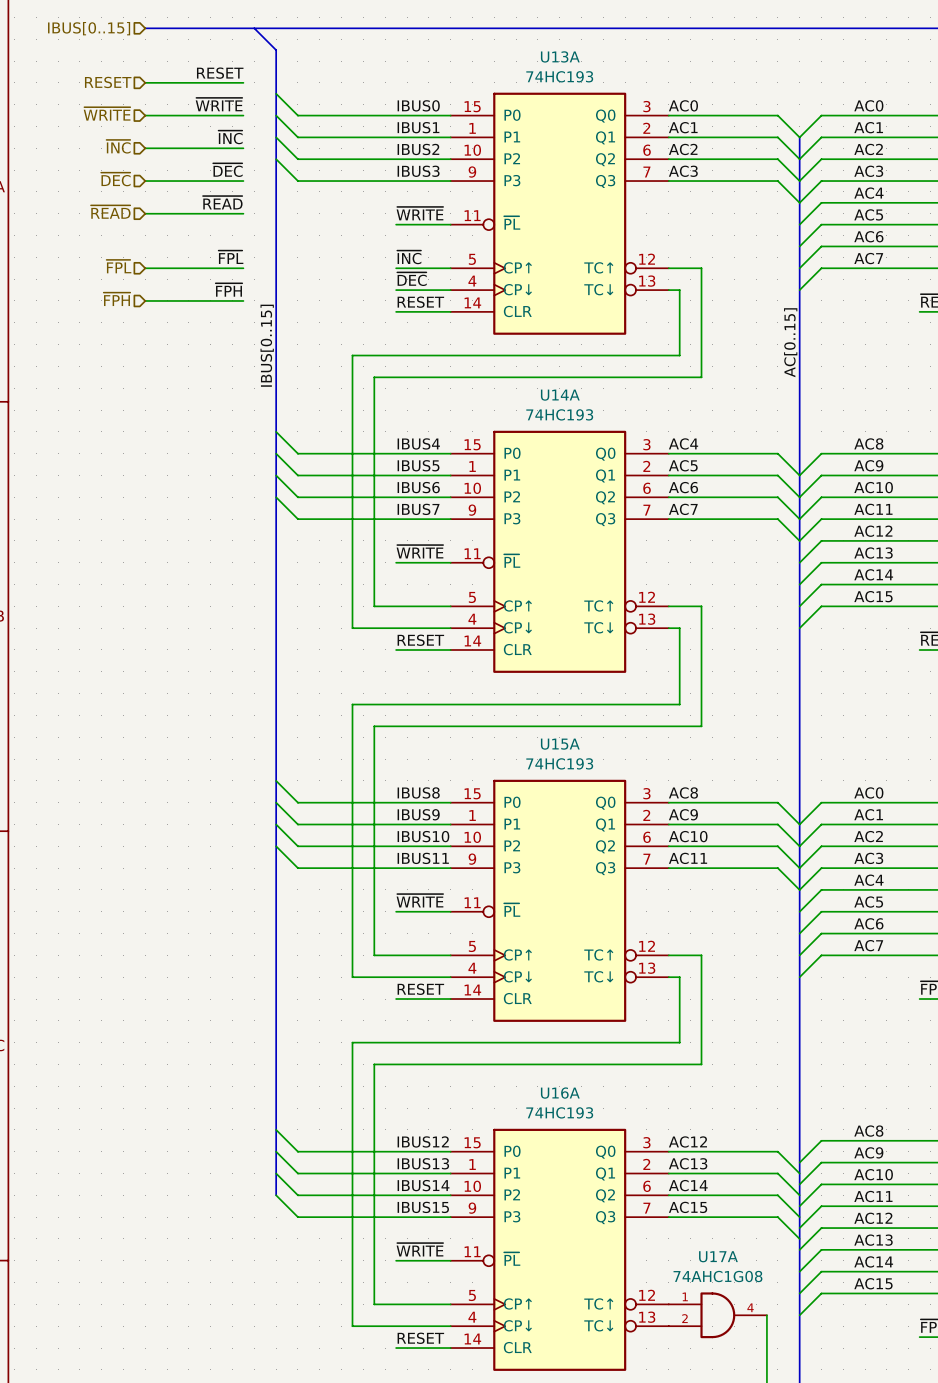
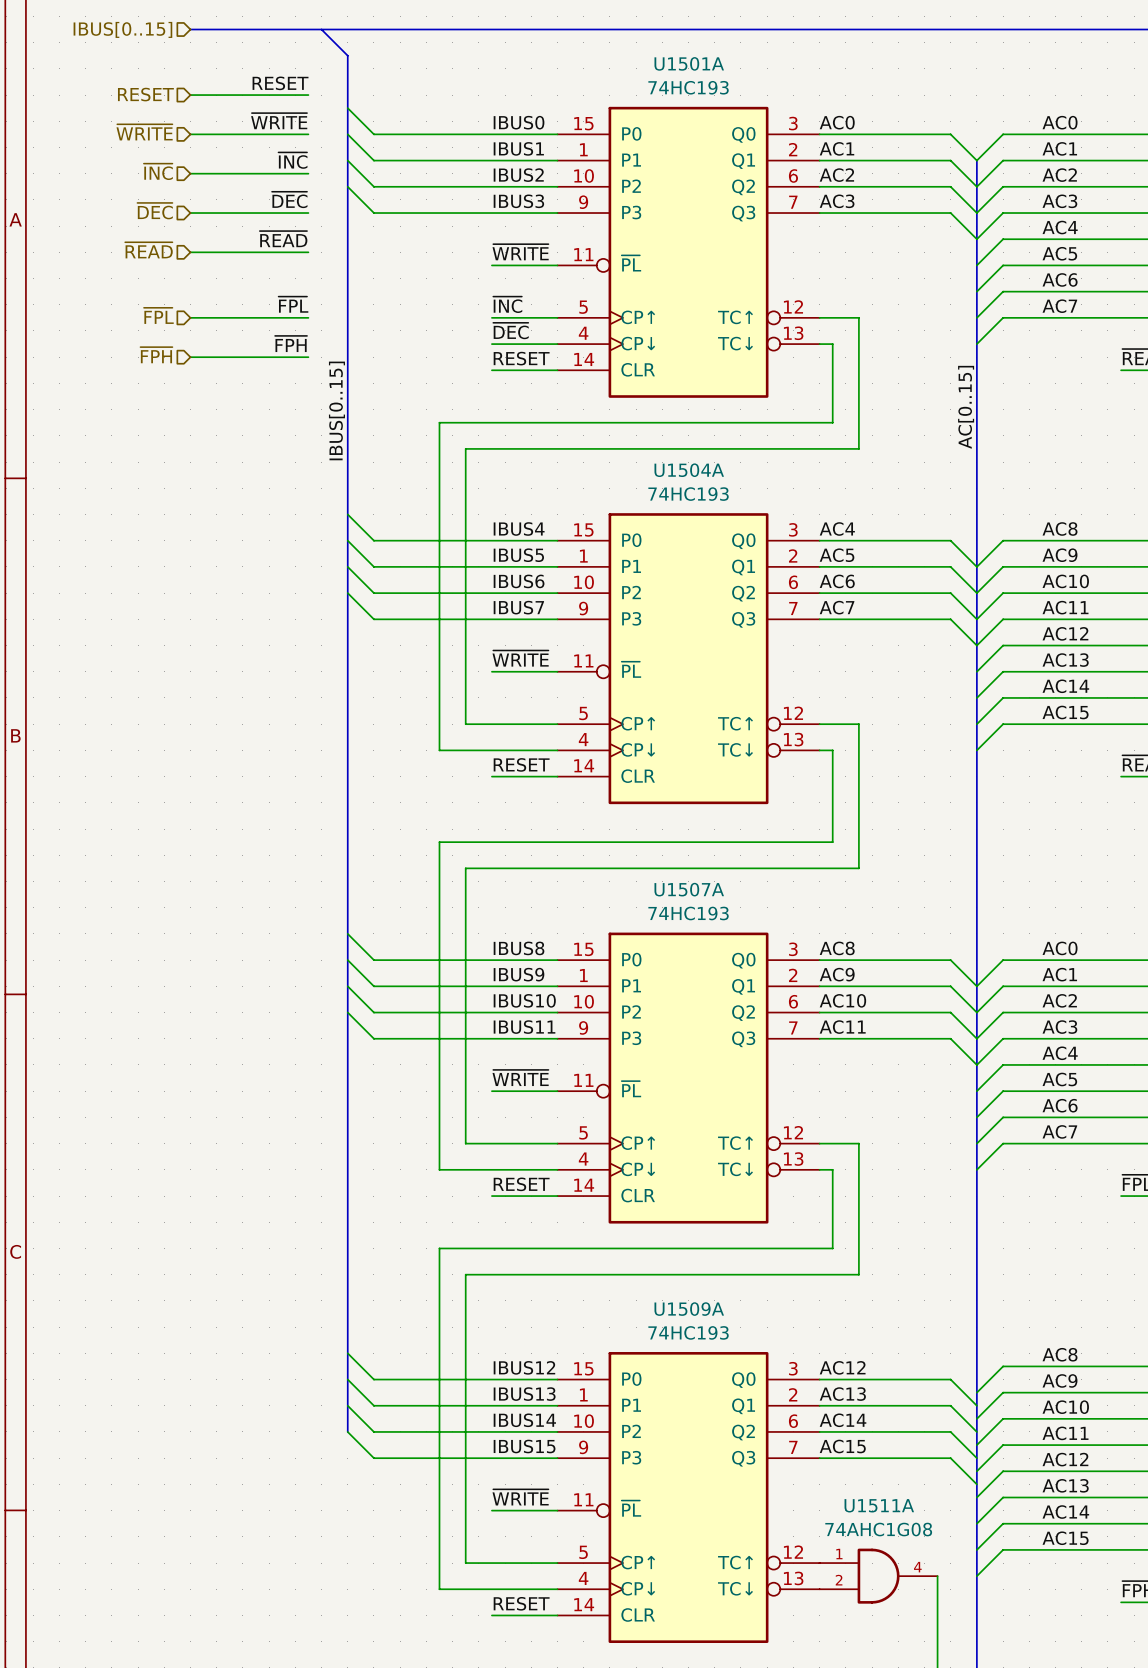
U13A name: U13A (560, 56) -> U1501A (689, 63)
U14A name: U14A (560, 395) -> U1504A (689, 470)
U15A name: U15A (560, 744) -> U1507A (689, 889)
U16A name: U16A (560, 1093) -> U1509A (689, 1309)
U17A name: U17A (718, 1256) -> U1511A (879, 1505)

